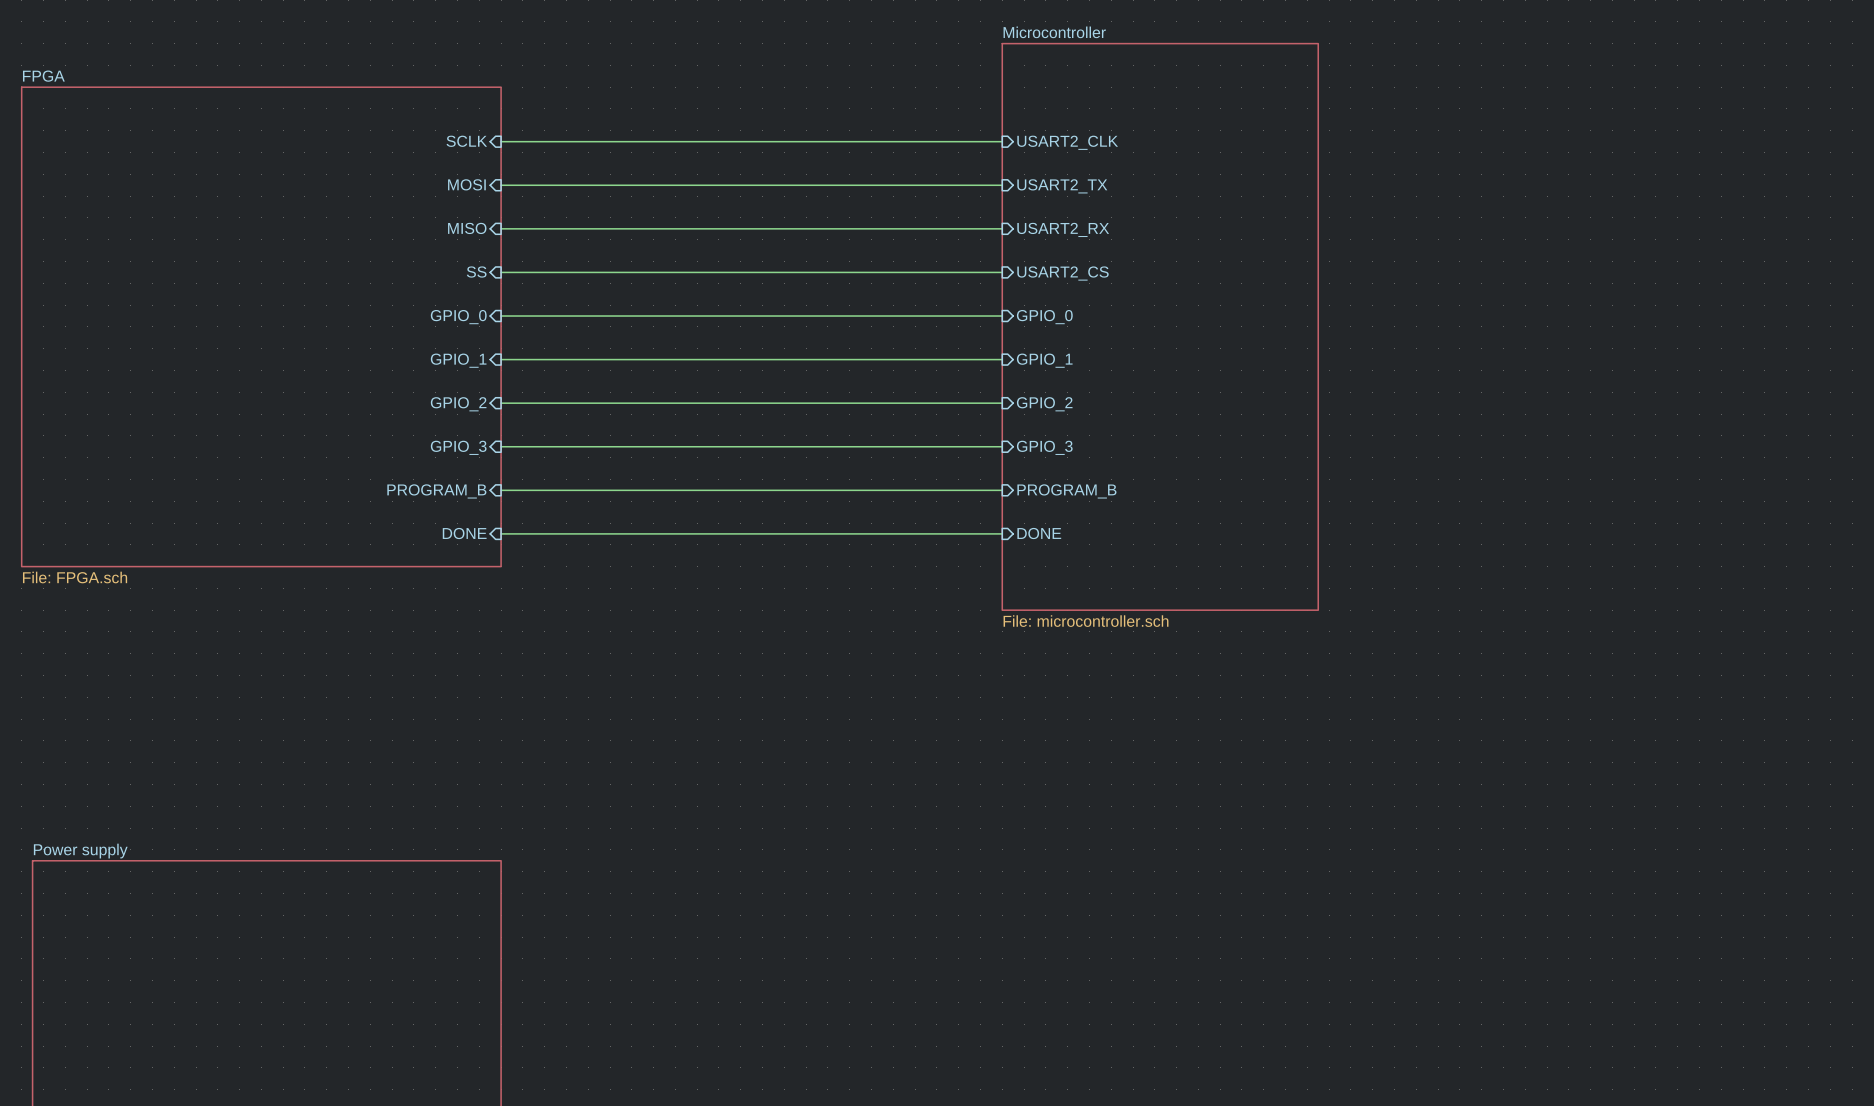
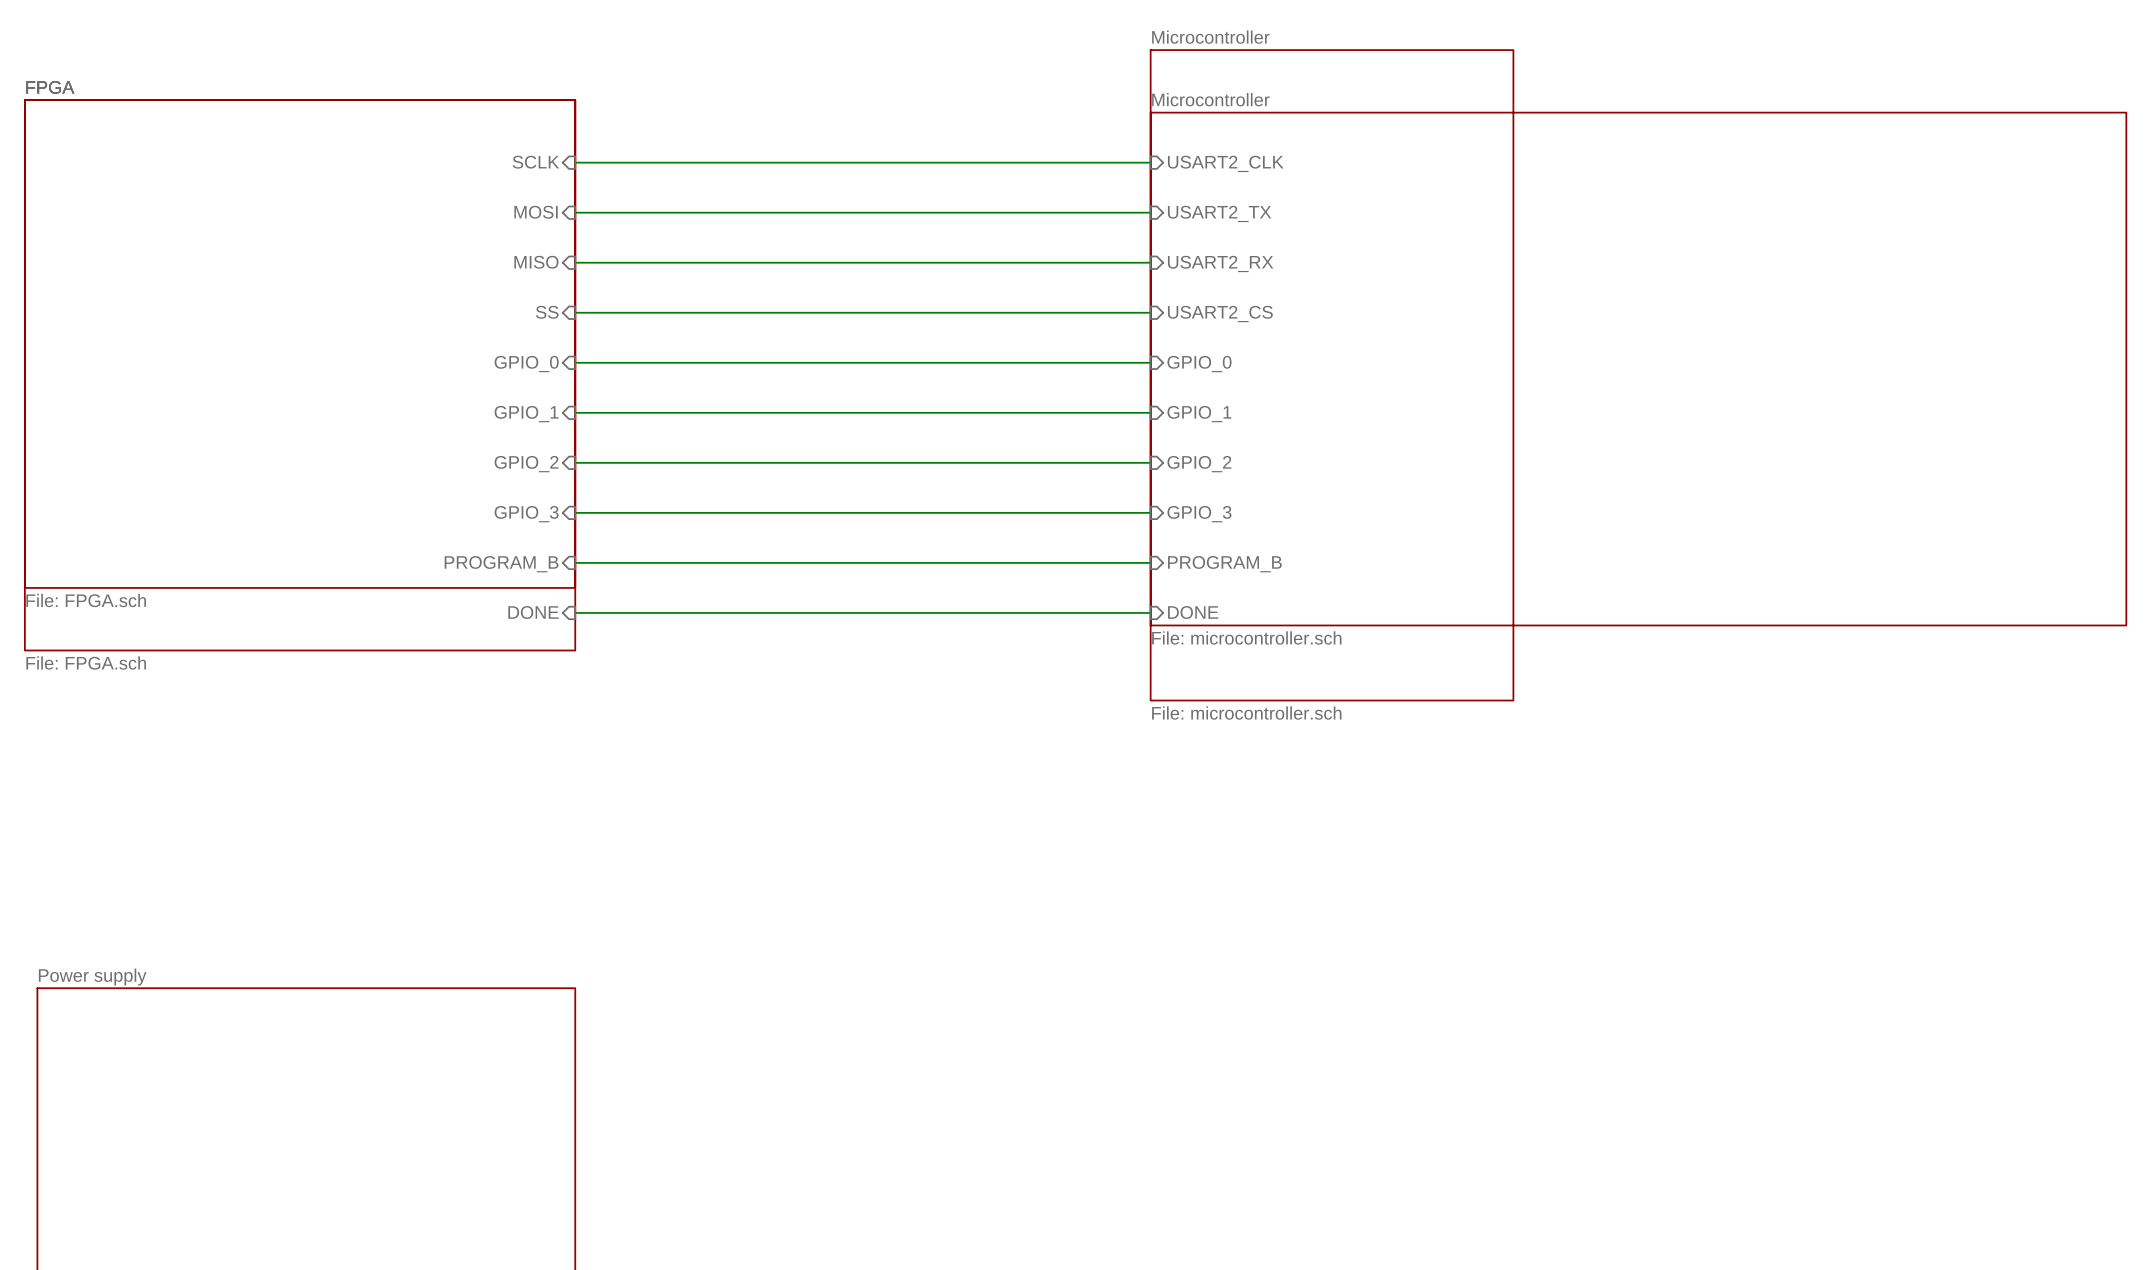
sheet FPGA: none -> File: FPGA.sch (300, 344)
sheet Microcontroller: none -> File: microcontroller.sch (1638, 369)

